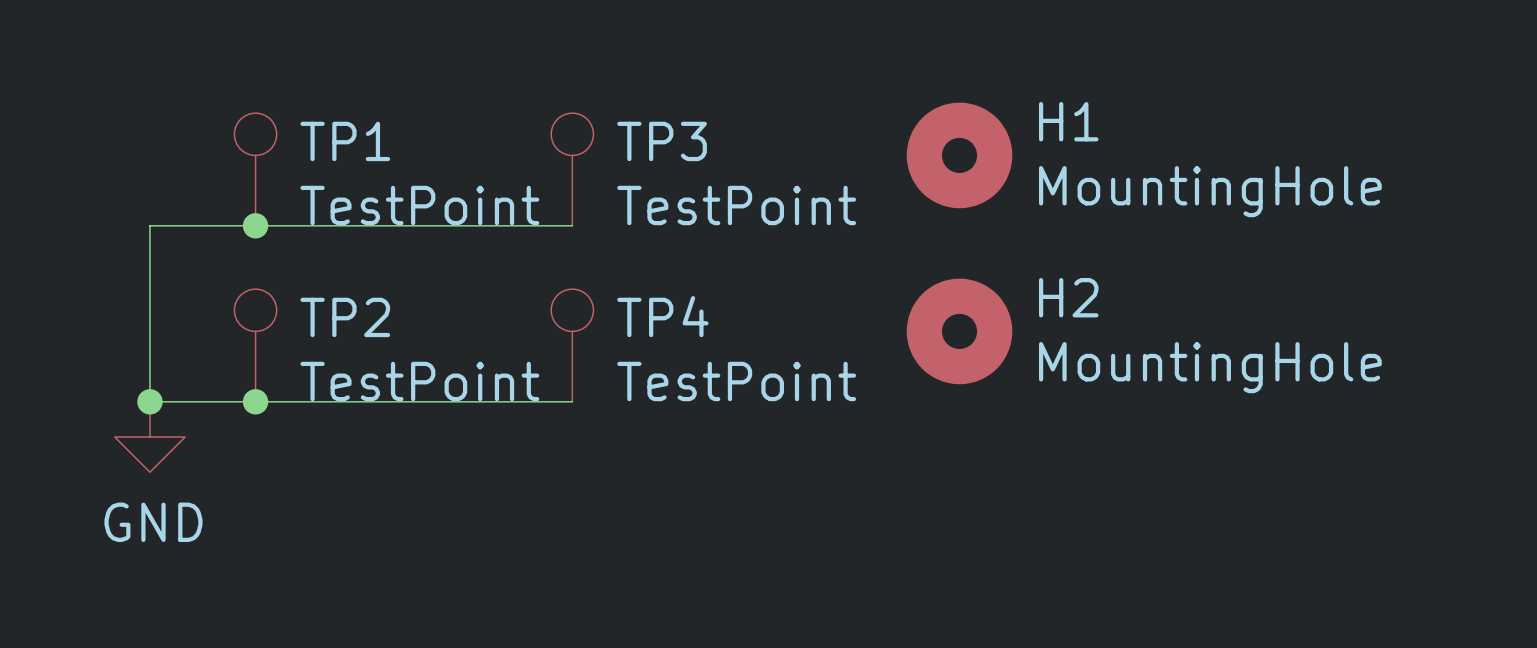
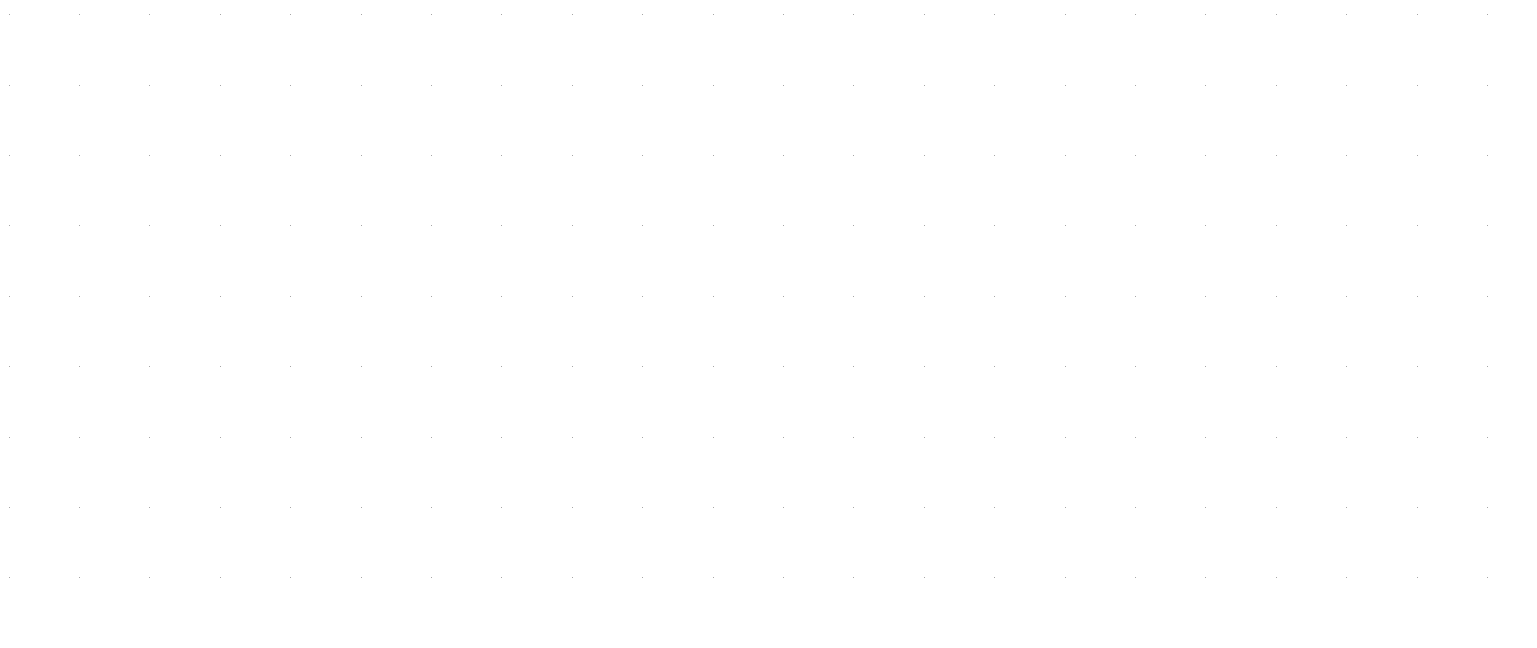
H1: MountingHole (959, 155) -> none
TP1: TestPoint (255, 169) -> none
TP3: TestPoint (572, 169) -> none
junction: (255, 225) -> none
wire: (572, 225) (149, 225) (149, 401) (572, 401) -> none
H2: MountingHole (959, 331) -> none
TP2: TestPoint (255, 345) -> none
TP4: TestPoint (572, 345) -> none
junction: (149, 401) -> none
junction: (255, 401) -> none
power symbol: GND (149, 437) -> none

